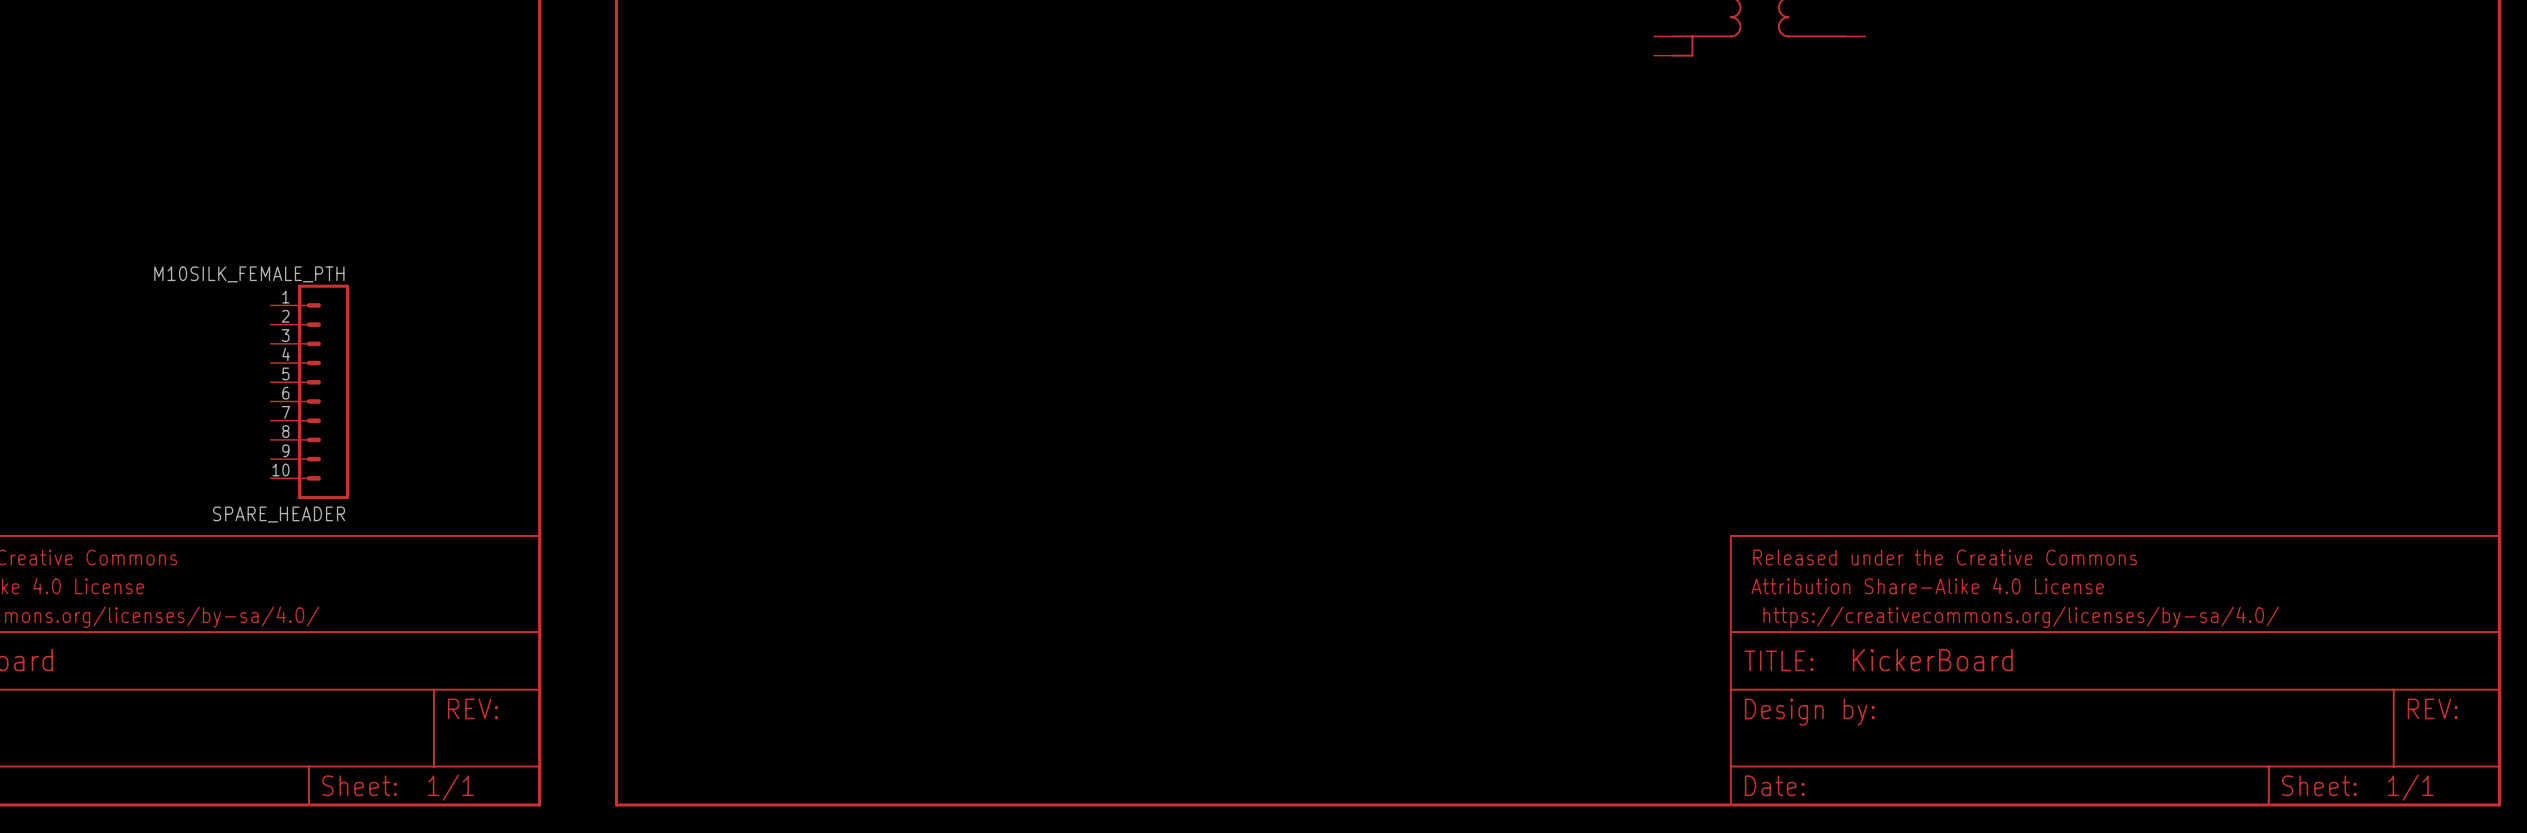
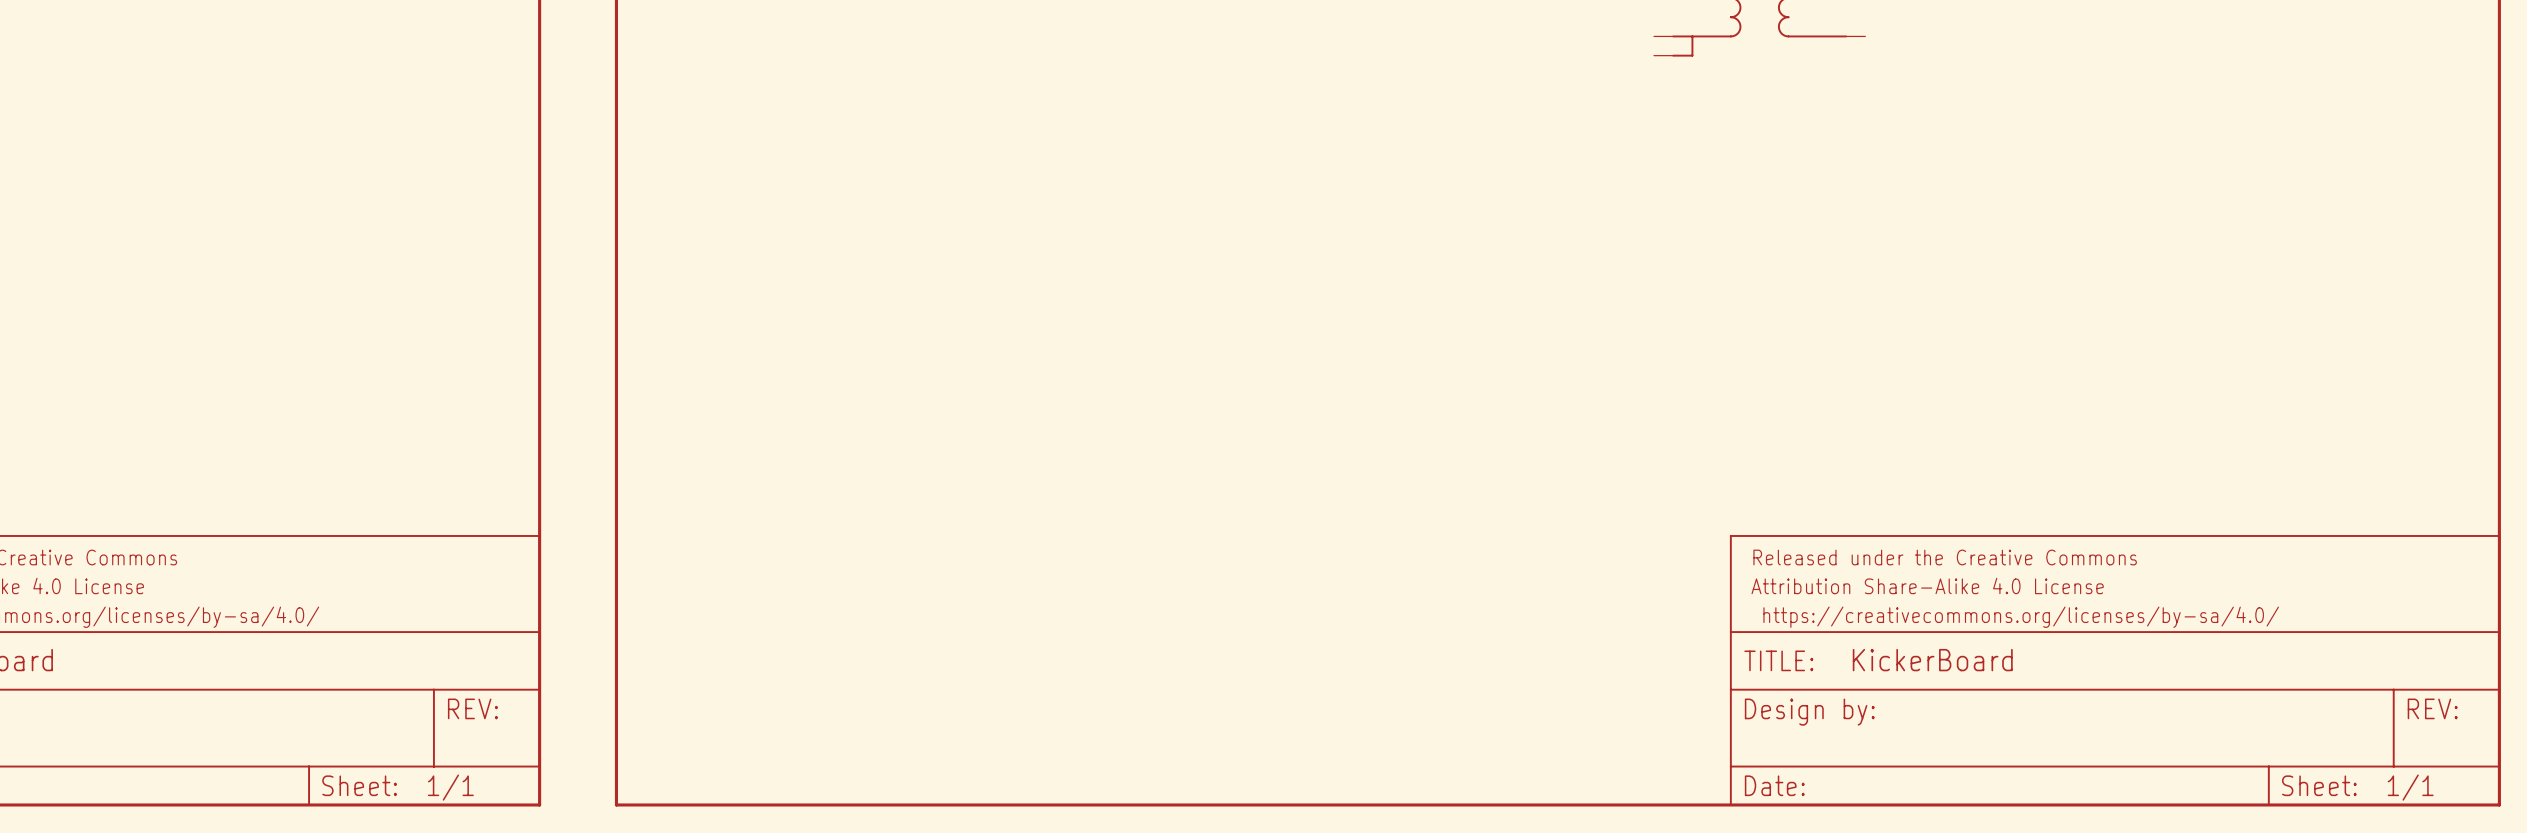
SPARE_HEADER: M10SILK_FEMALE_PTH (309, 391) -> none

